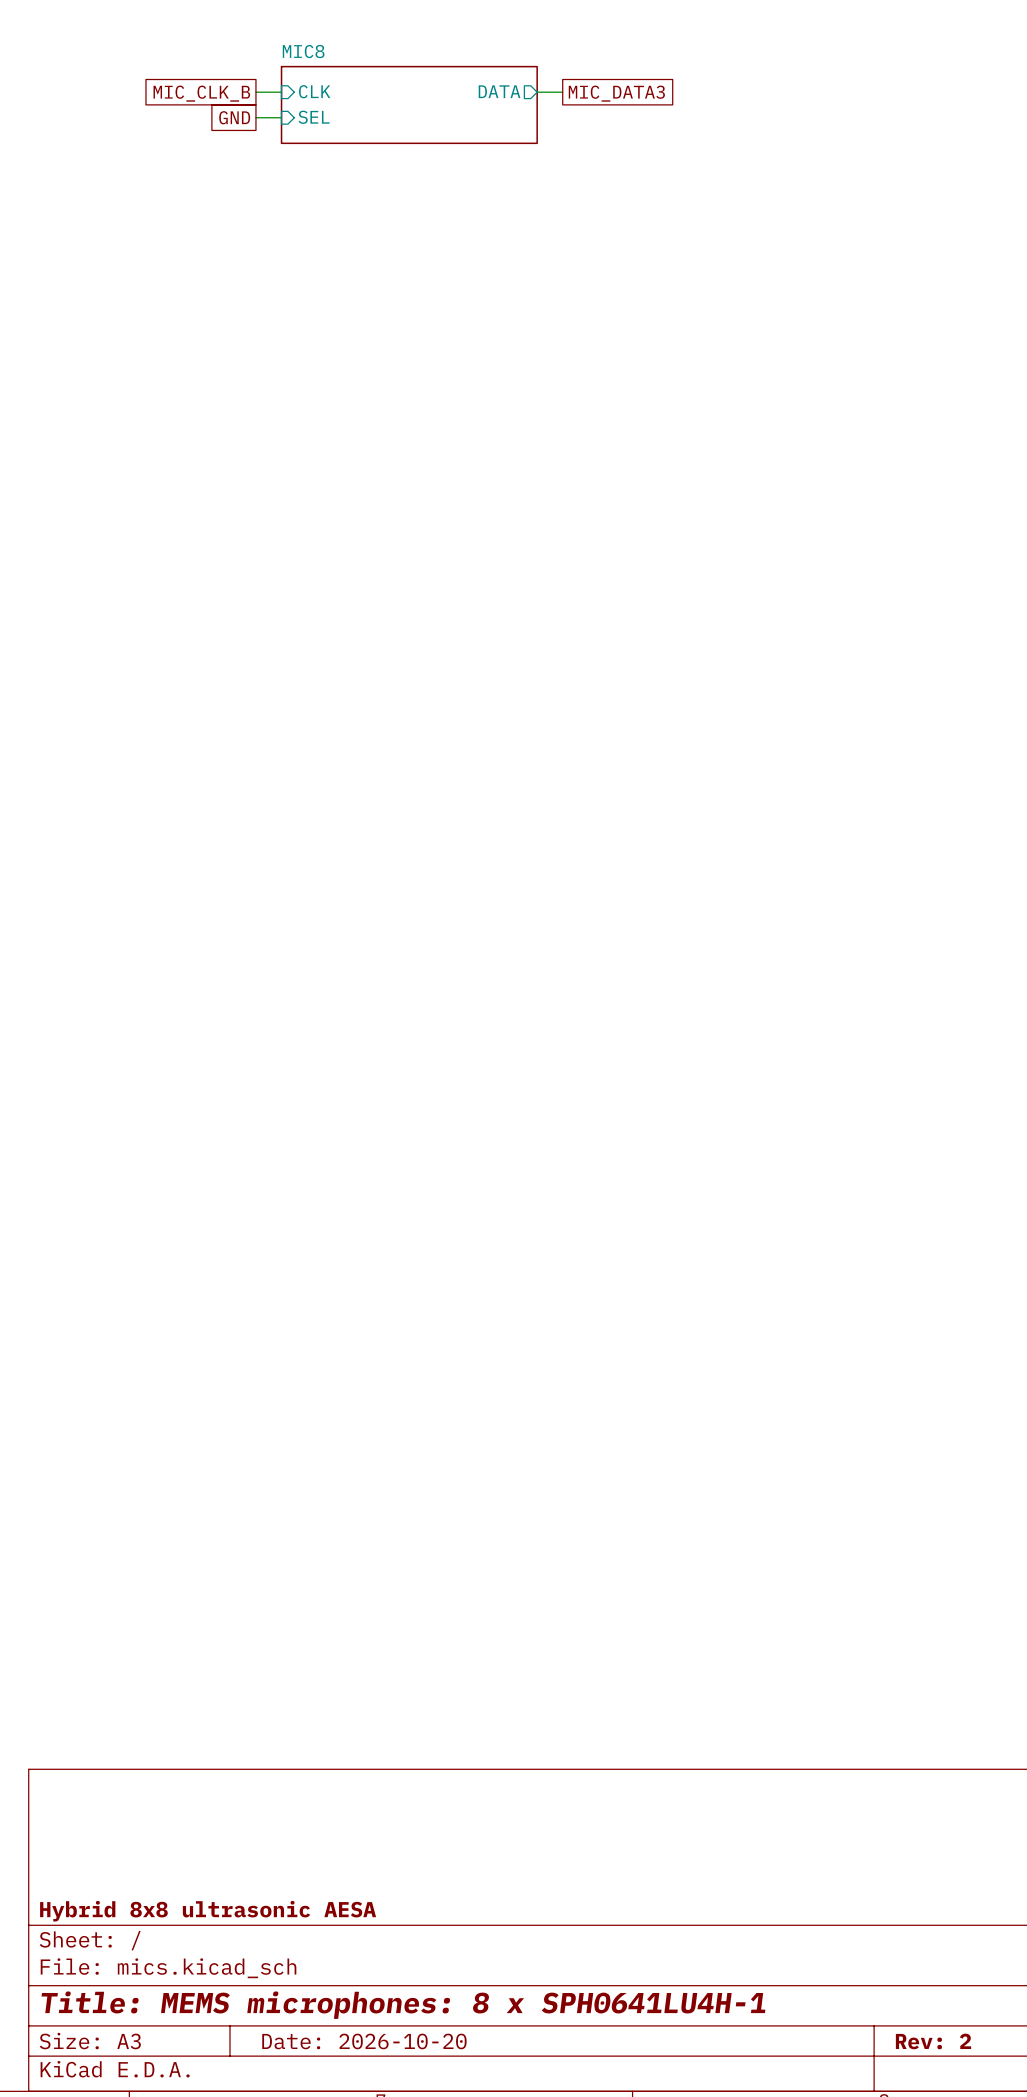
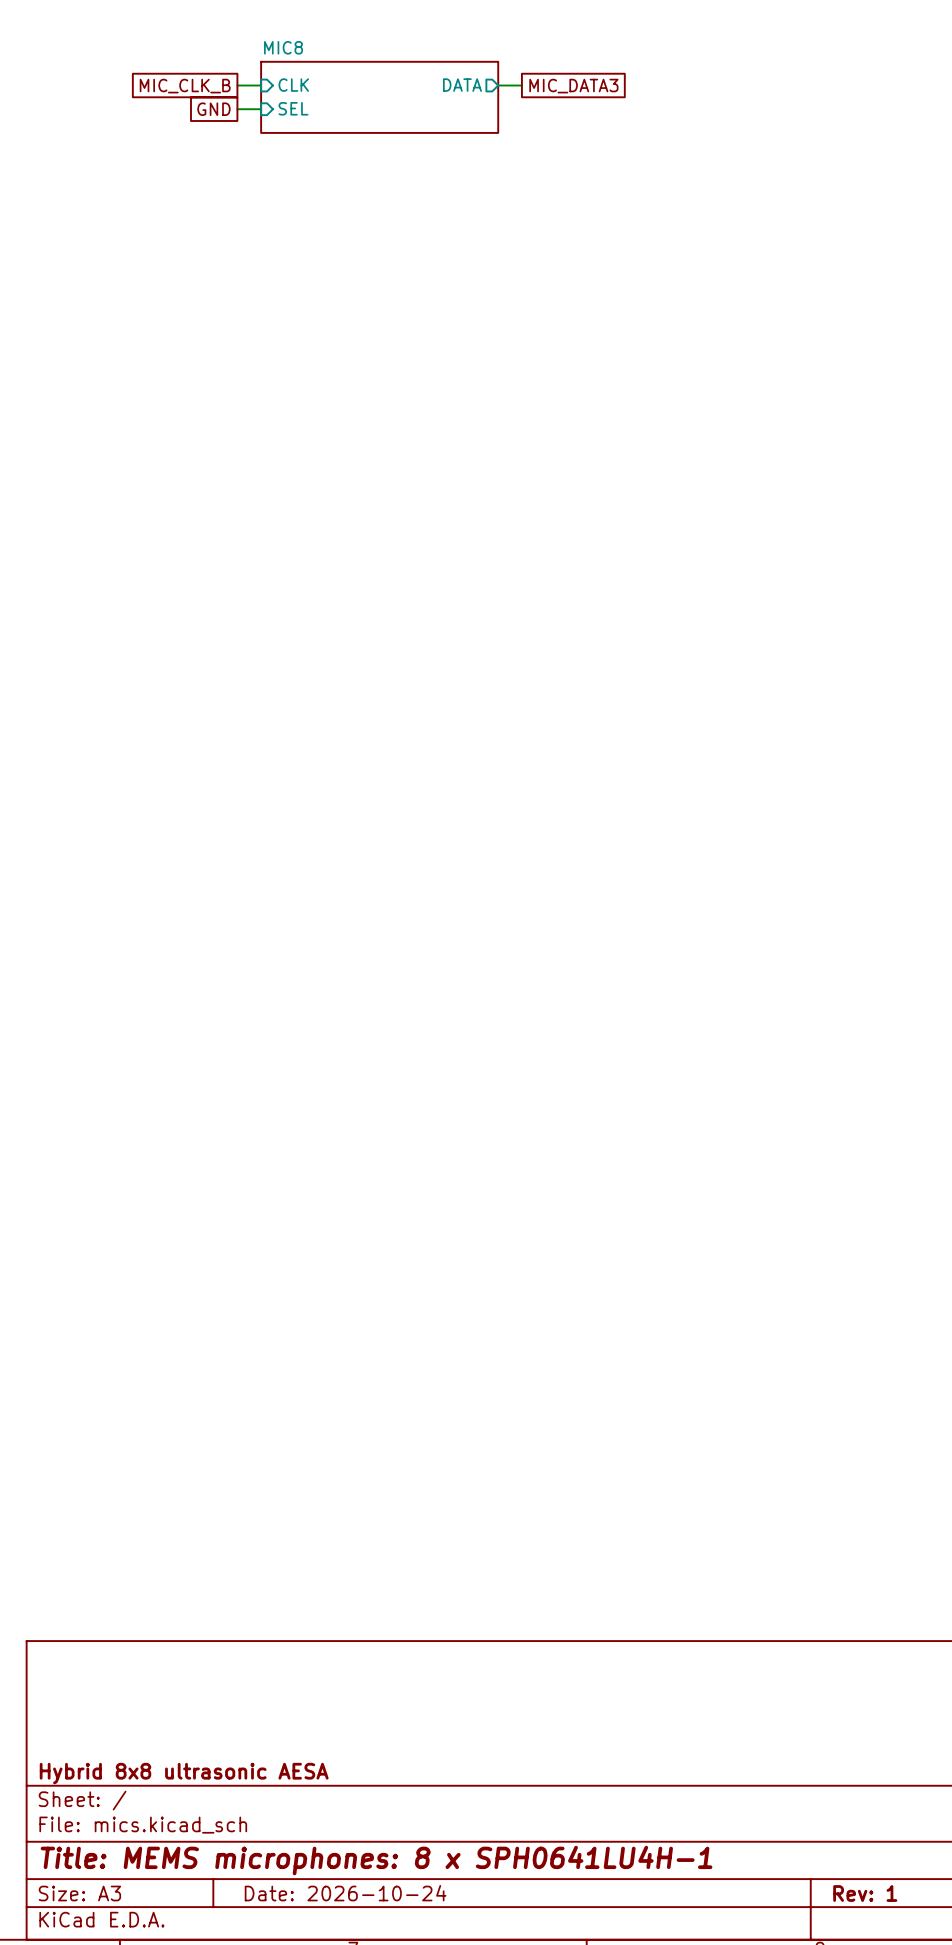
title block: Date: 2026-10-20 (364, 2041) -> Date: 2026-10-24 (345, 1893)
title block: Rev: 2 (933, 2041) -> Rev: 1 (865, 1893)

